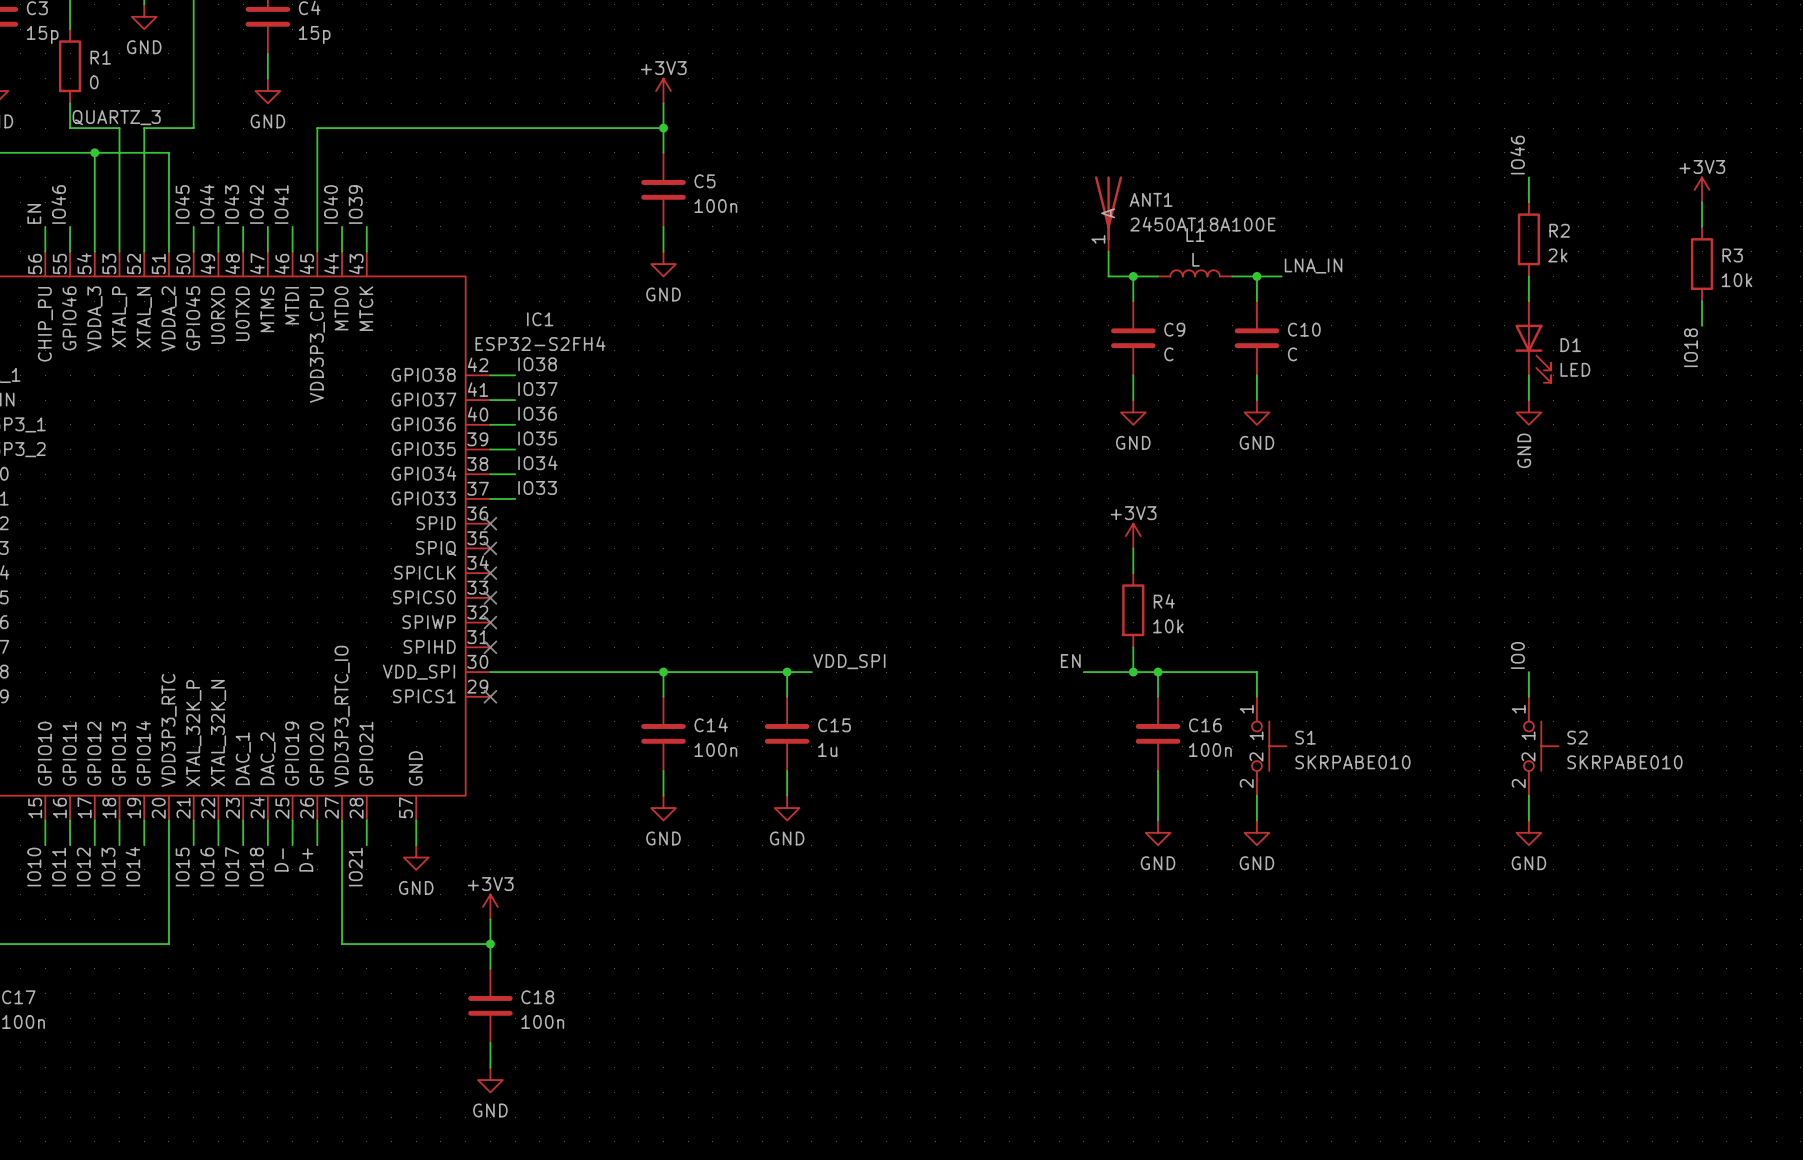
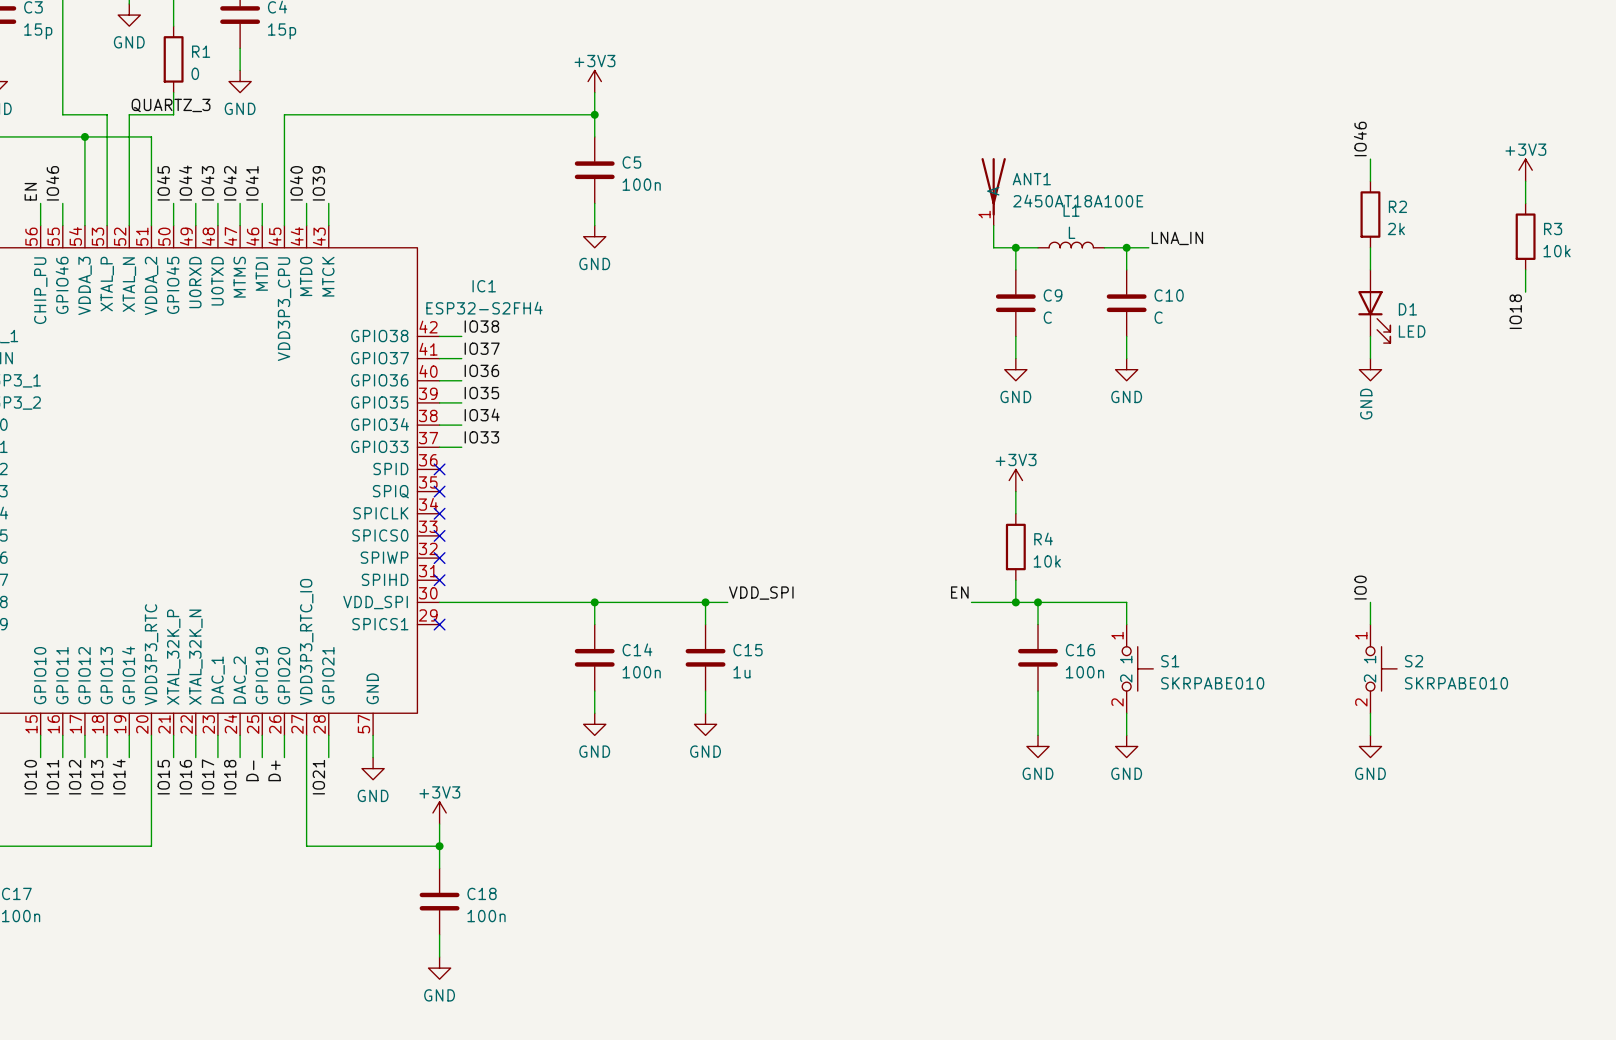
wire: (193, 29) (193, 103) -> (62, 26) (62, 92)
R1 position: (70, 66) -> (173, 59)
label position: QUARTZ_3 (116, 117) -> QUARTZ_3 (171, 105)

